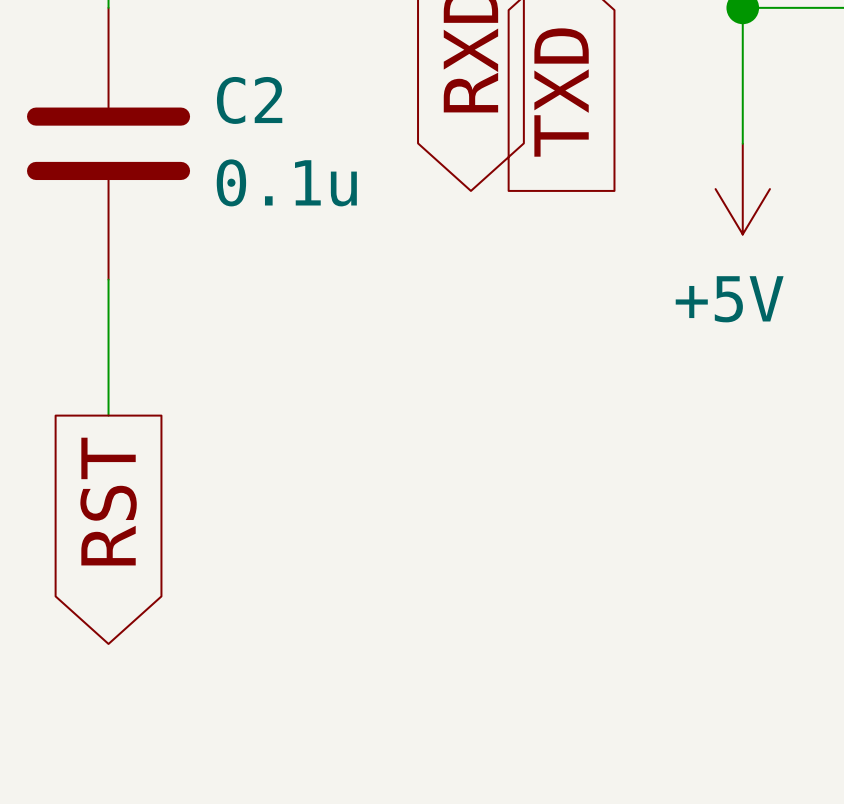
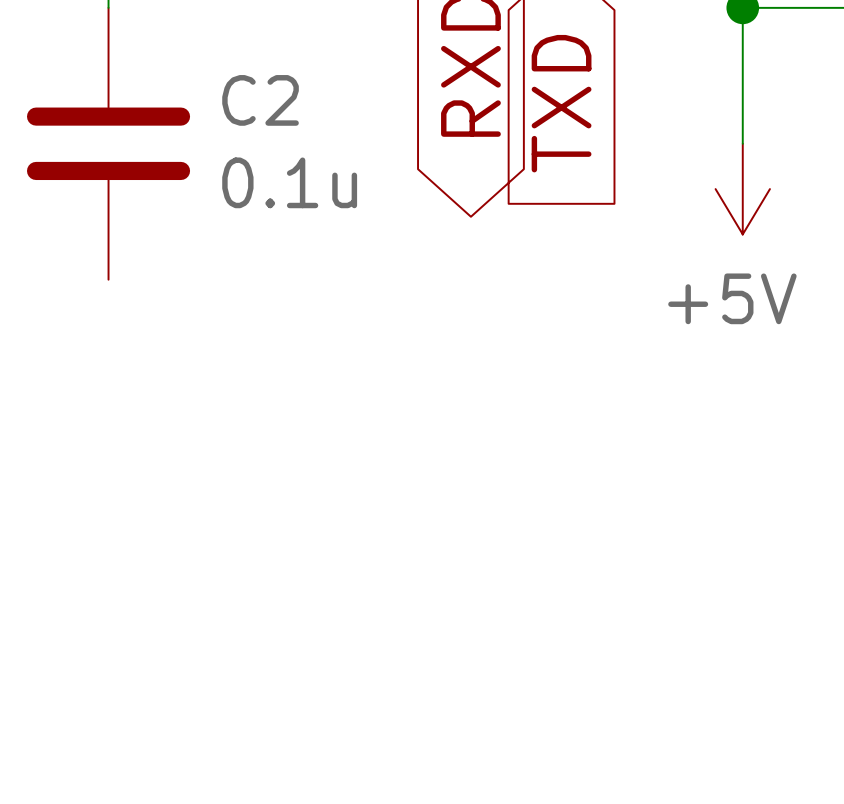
wire: (108, 279) (108, 415) -> none
global label: RST (108, 501) -> none

